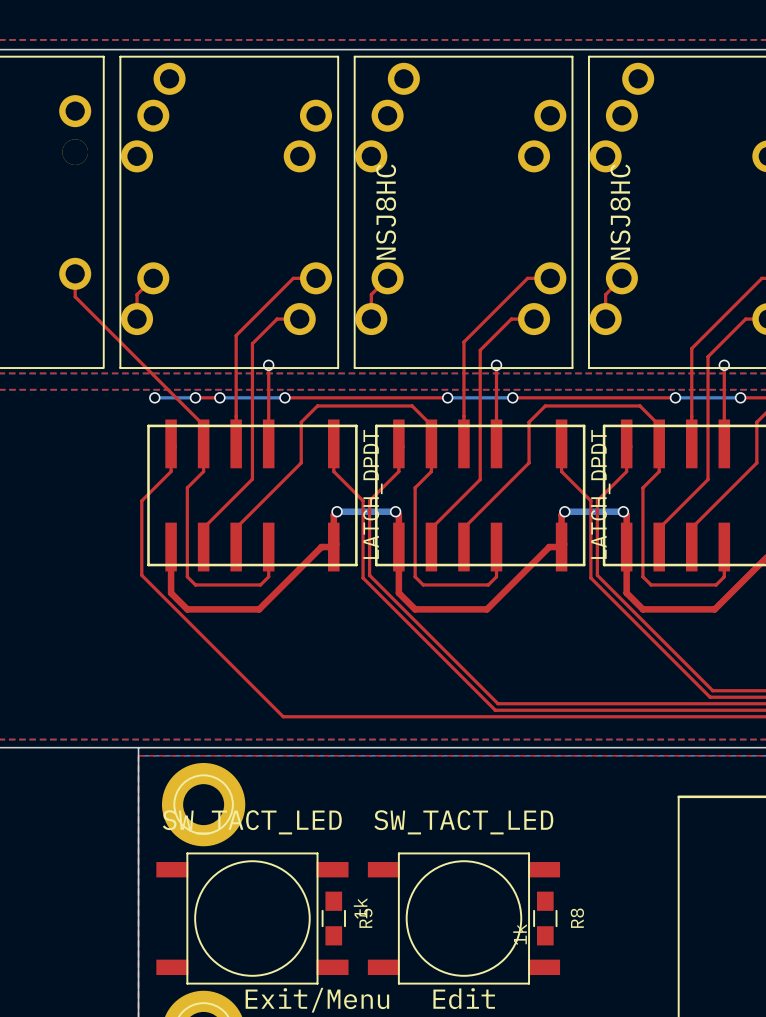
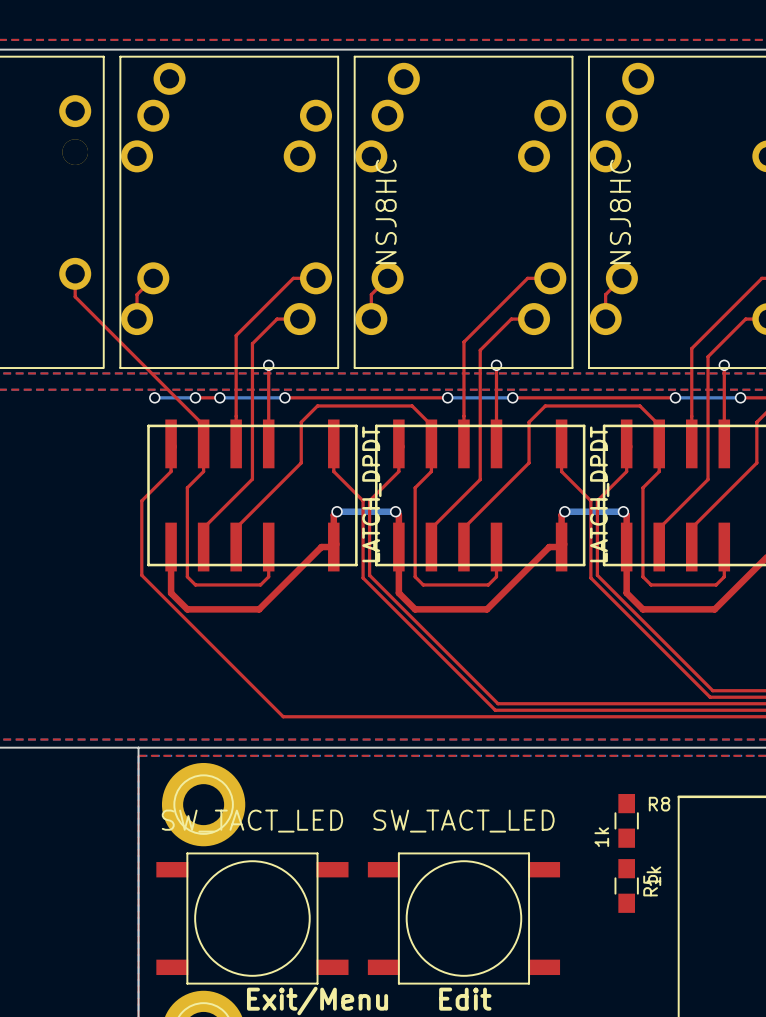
R5 position: (333, 918) -> (626, 885)
R5 name position: R5 (365, 918) -> R5 (650, 885)
R8 position: (545, 918) -> (626, 820)
R8 name rotation: 0° (577, 918) -> 90° clockwise (659, 804)

